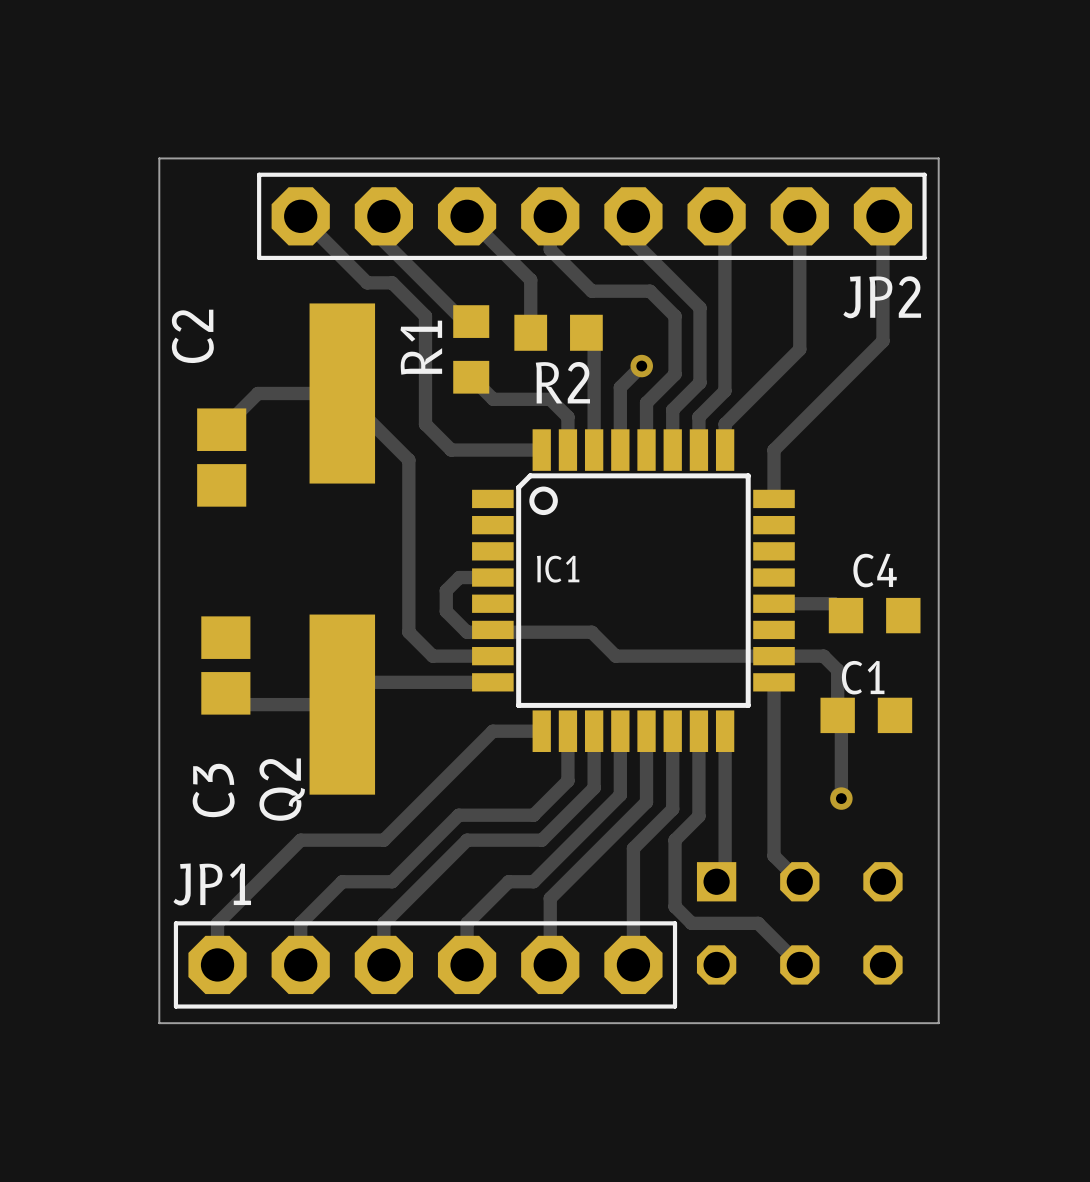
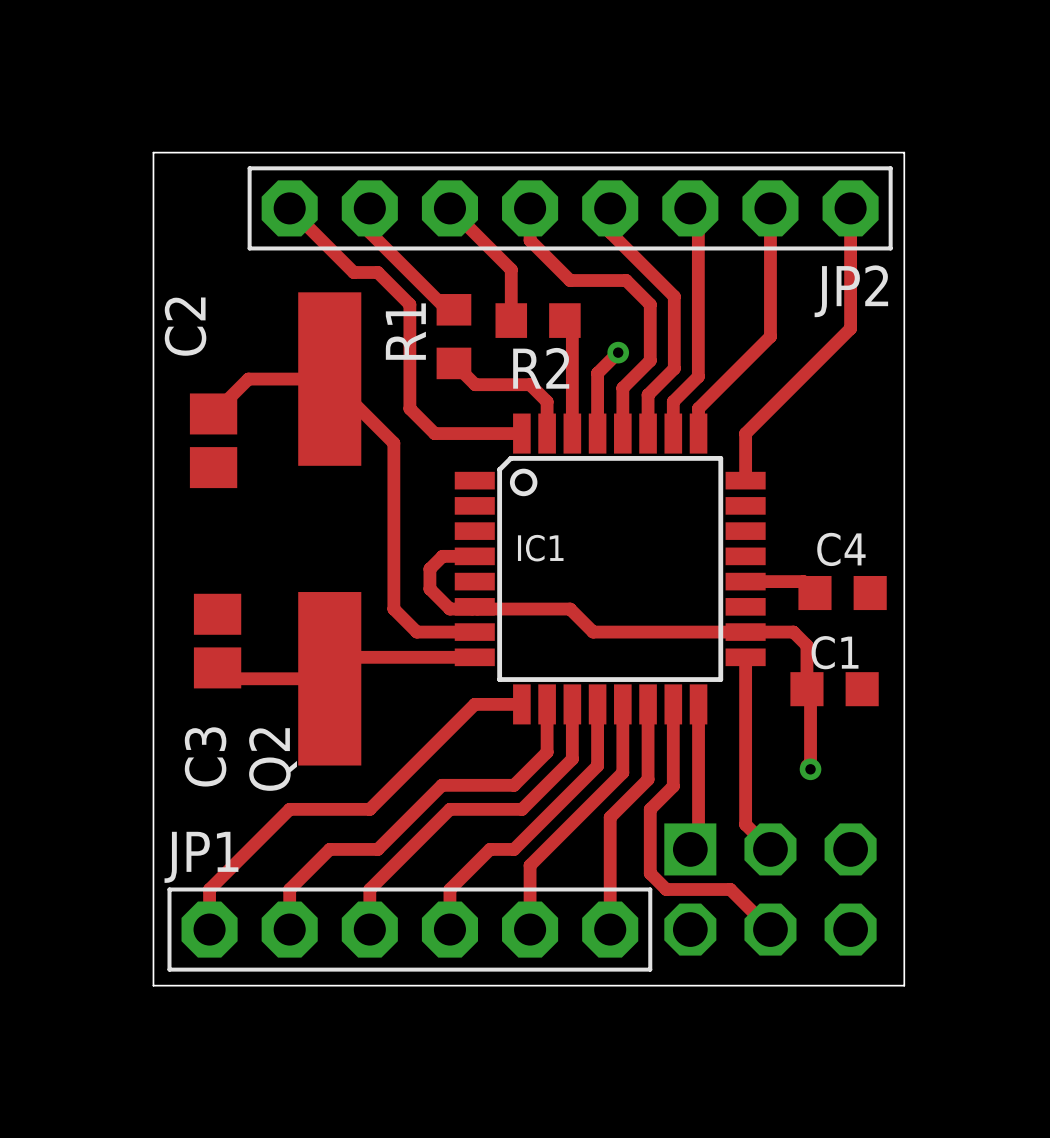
part footprint: [696, 862, 903, 985] -> [664, 823, 877, 956]

